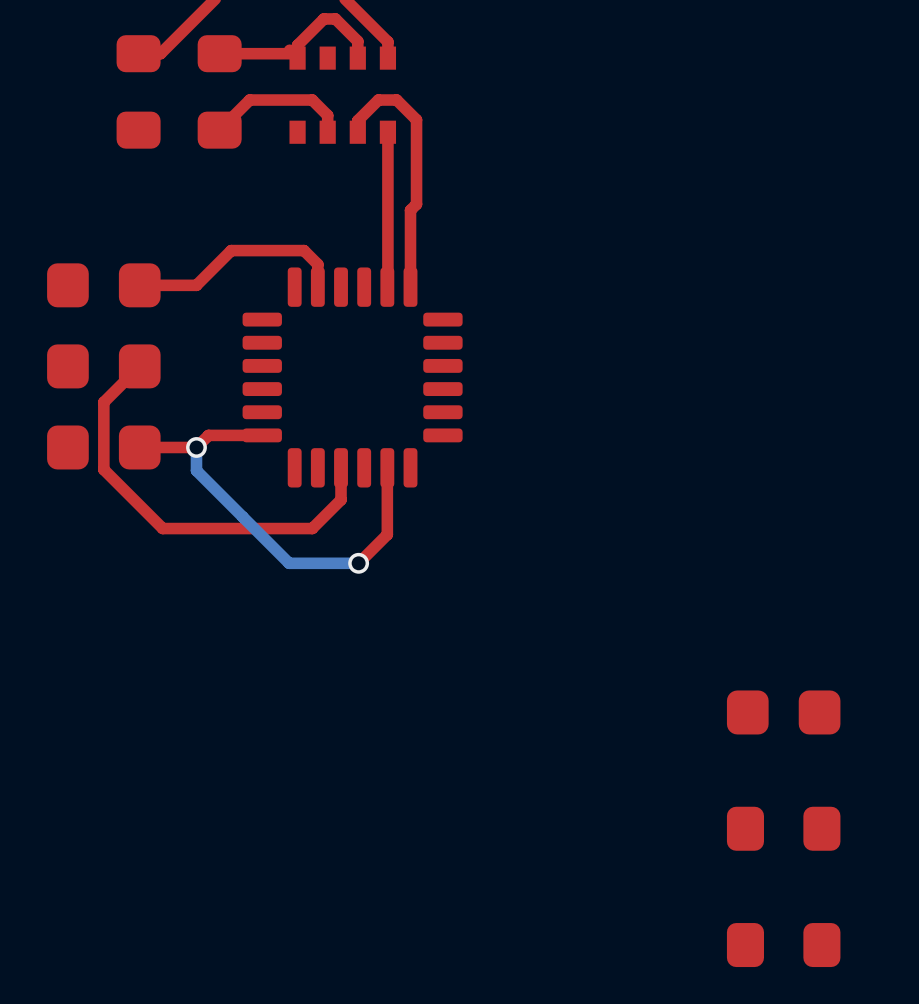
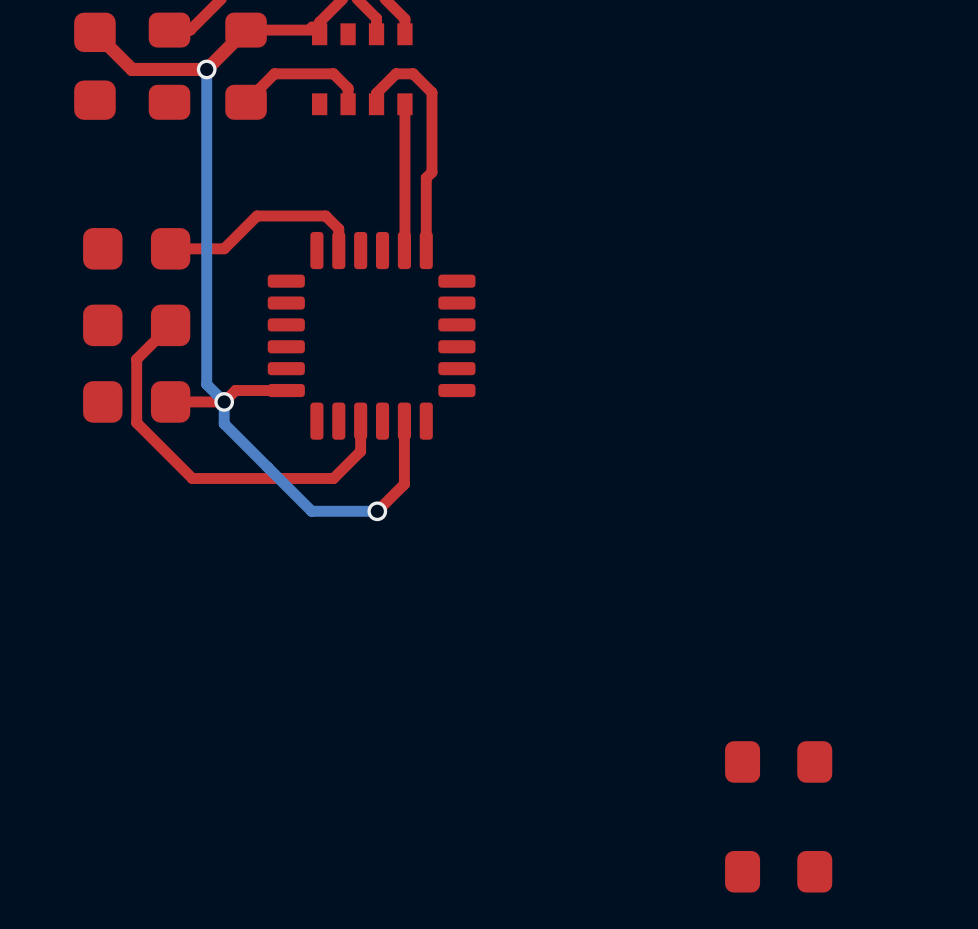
top track: none -> (246, 30) (206, 69) (132, 69) (94, 32)
part: none -> (94, 66)
bottom track: none -> (206, 69) (206, 384) (224, 401)
via: none -> (206, 69)
part: (783, 712) -> none

